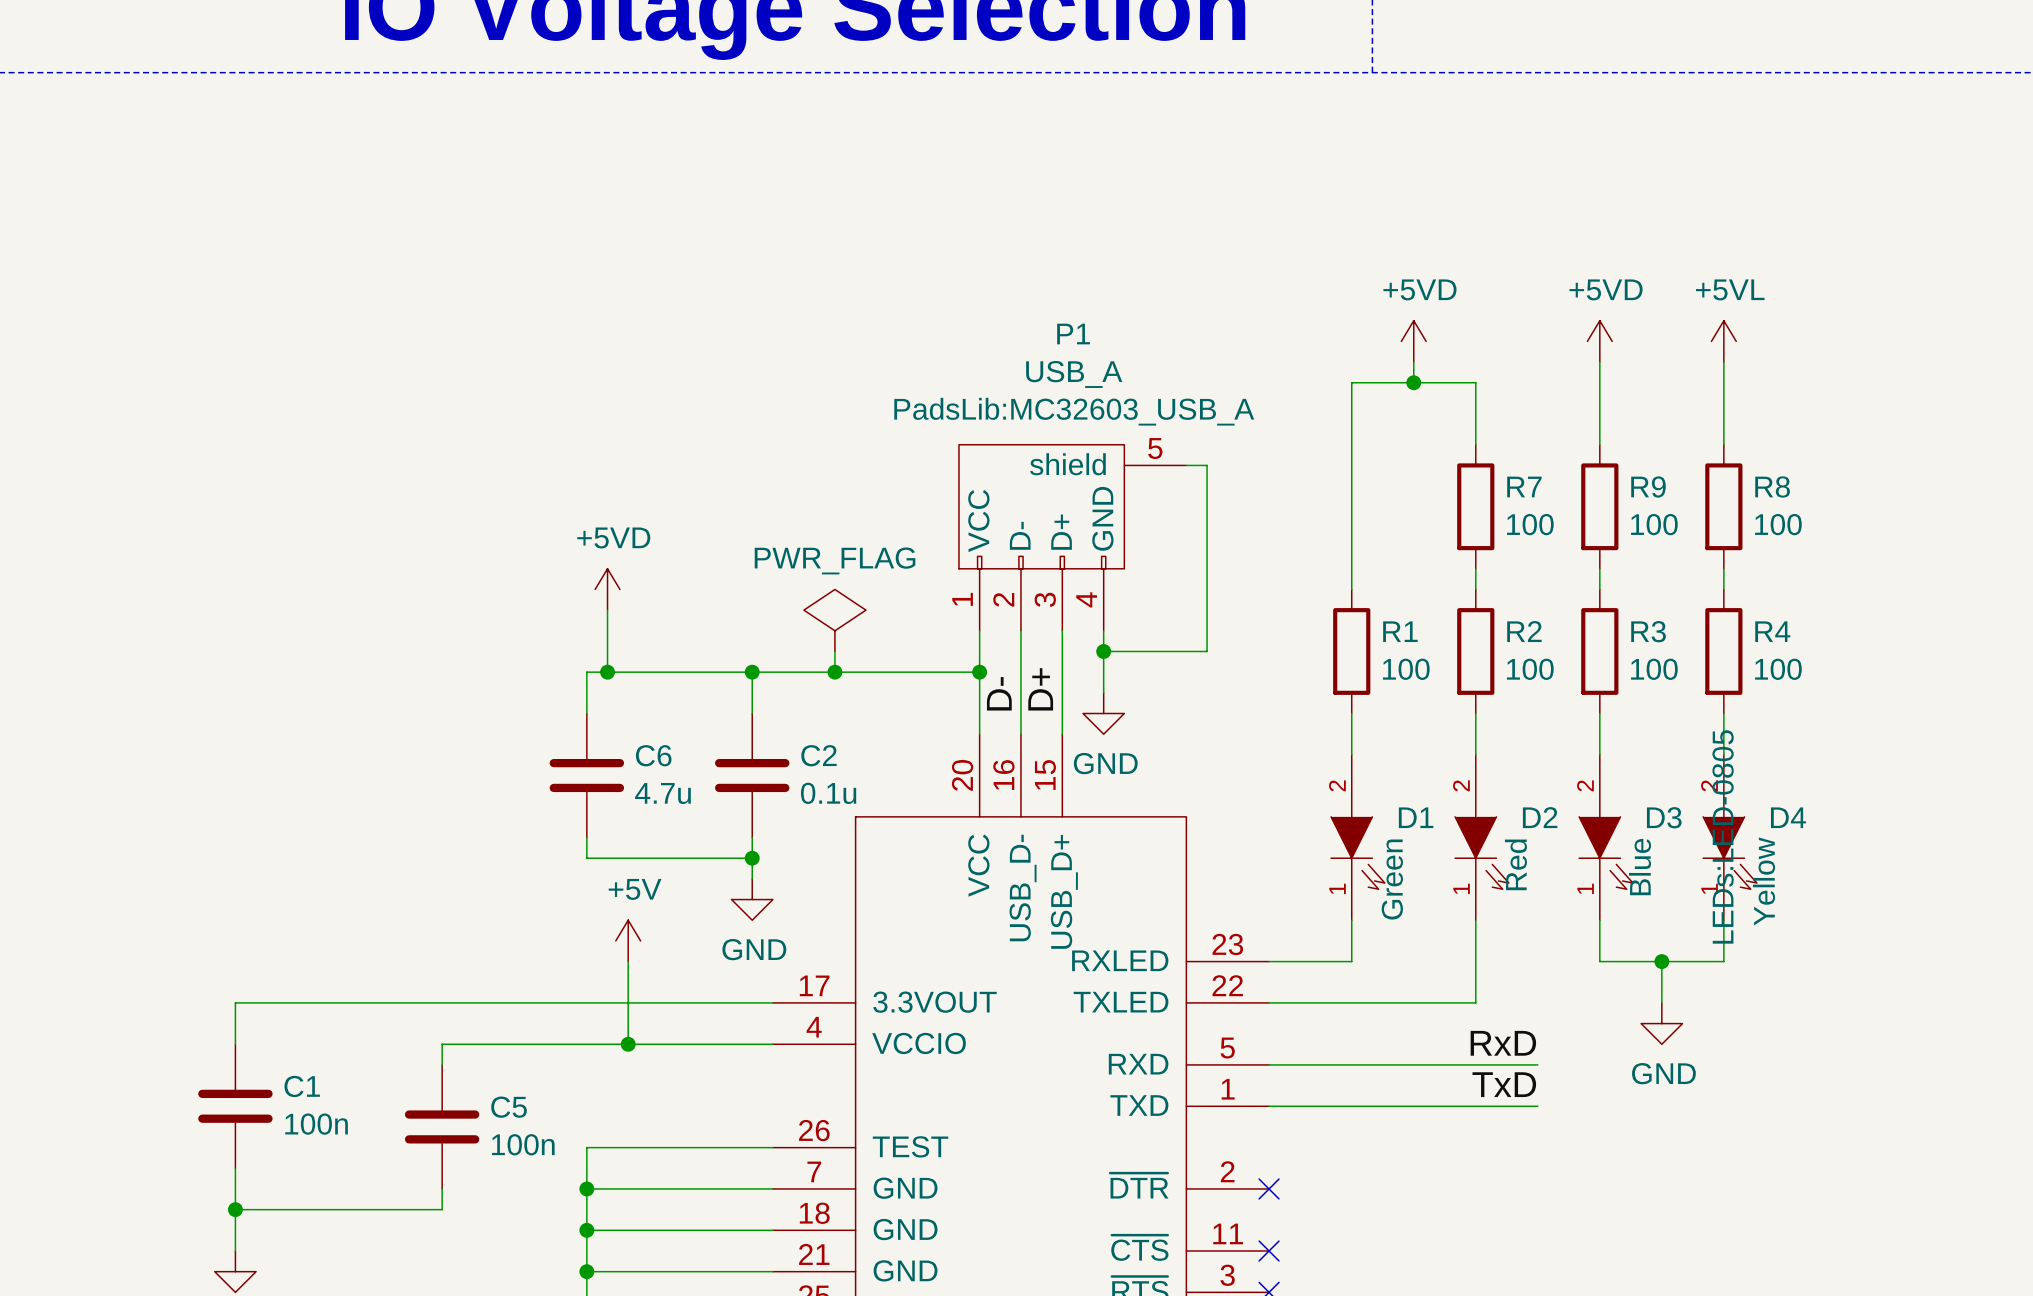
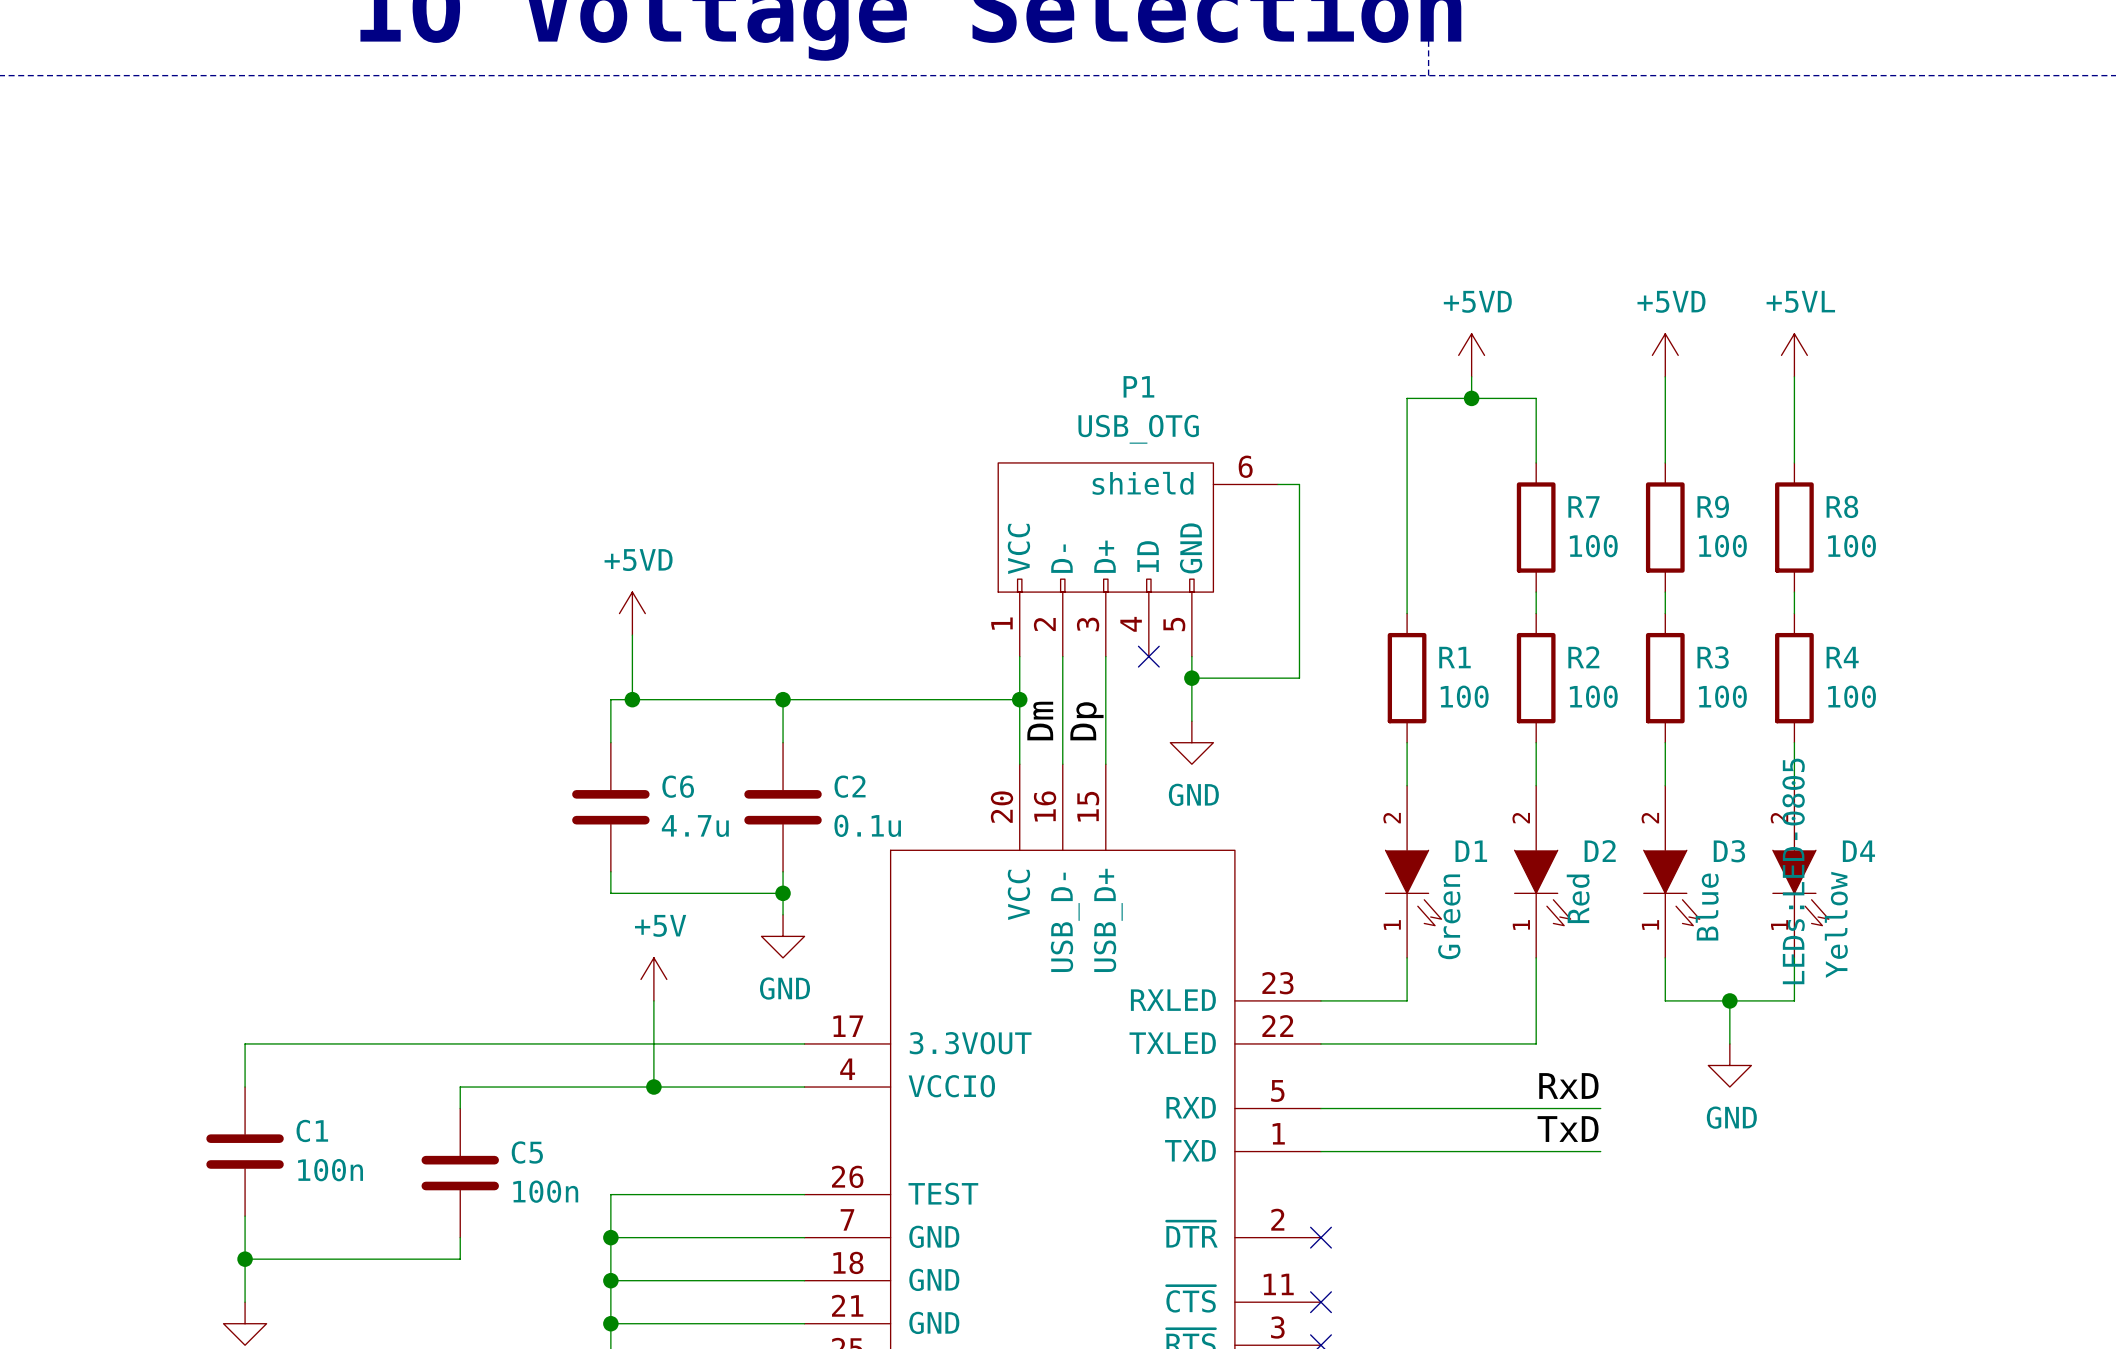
P1 name position: P1 (1073, 334) -> P1 (1138, 386)
P1 value: USB_A (1074, 374) -> USB_OTG (1138, 429)
P1 text: PadsLib:MC32603_USB_A (1074, 411) -> none
P1 symbol: [958, 444, 1187, 631] -> [998, 462, 1278, 657]
wire: (1186, 465) (1207, 465) (1207, 651) -> (1277, 484) (1299, 484) (1299, 678) (1256, 678)
power symbol: PWR_FLAG (834, 620) -> none
wire: (1103, 630) (1103, 692) -> (1191, 656) (1191, 721)
no-connect mark: none -> (1148, 656)
wire: (834, 651) (834, 672) -> none
wire: (1103, 651) (1145, 651) -> none
junction position: (1103, 651) -> (1191, 678)
junction: (834, 672) -> none
label: D+ (1040, 689) -> Dp (1086, 721)
label: D- (999, 693) -> Dm (1040, 721)
power symbol position: GND (1103, 713) -> GND (1191, 742)

